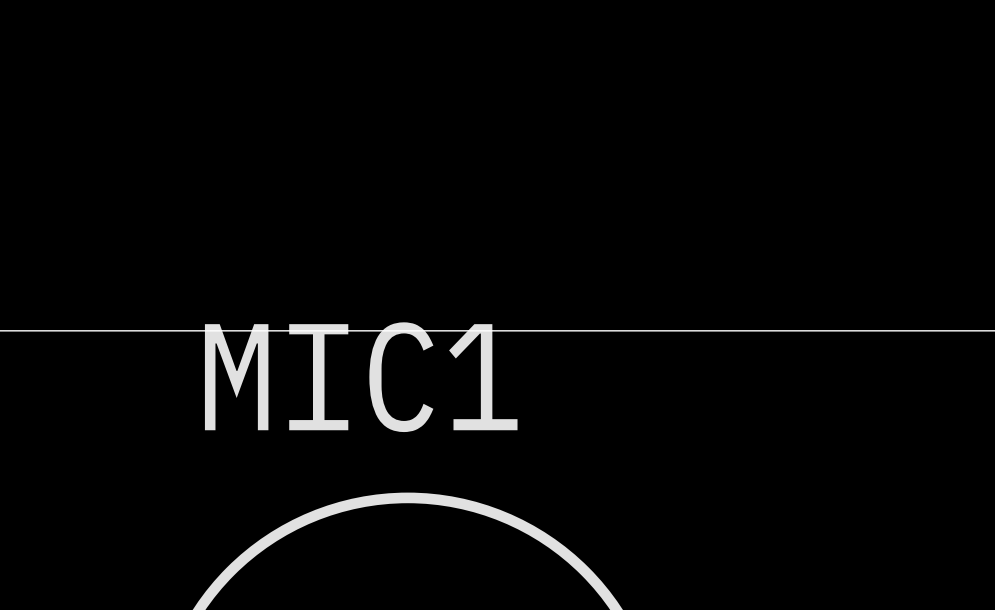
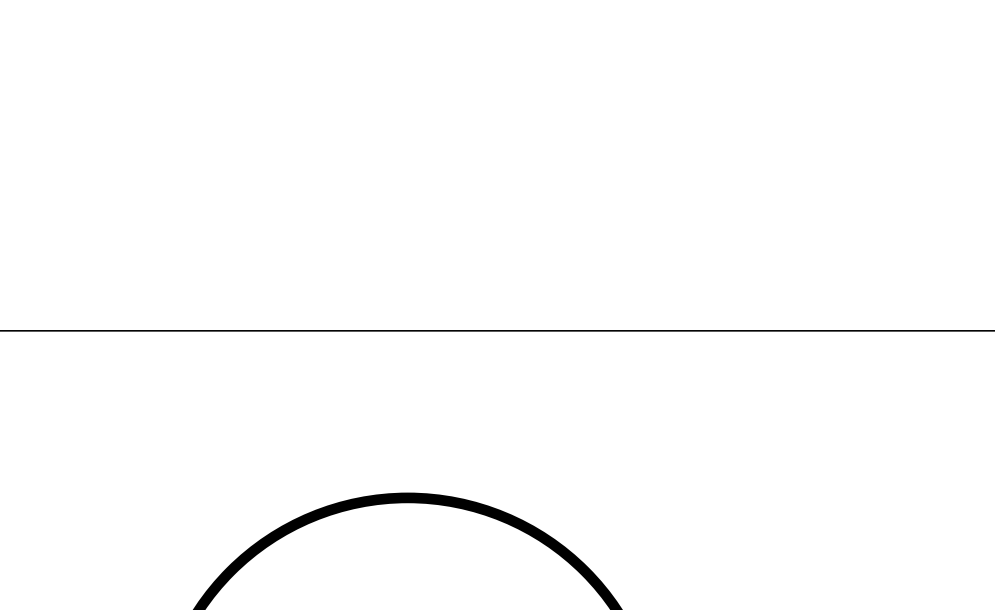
MIC1 name: MIC1 (361, 377) -> none

